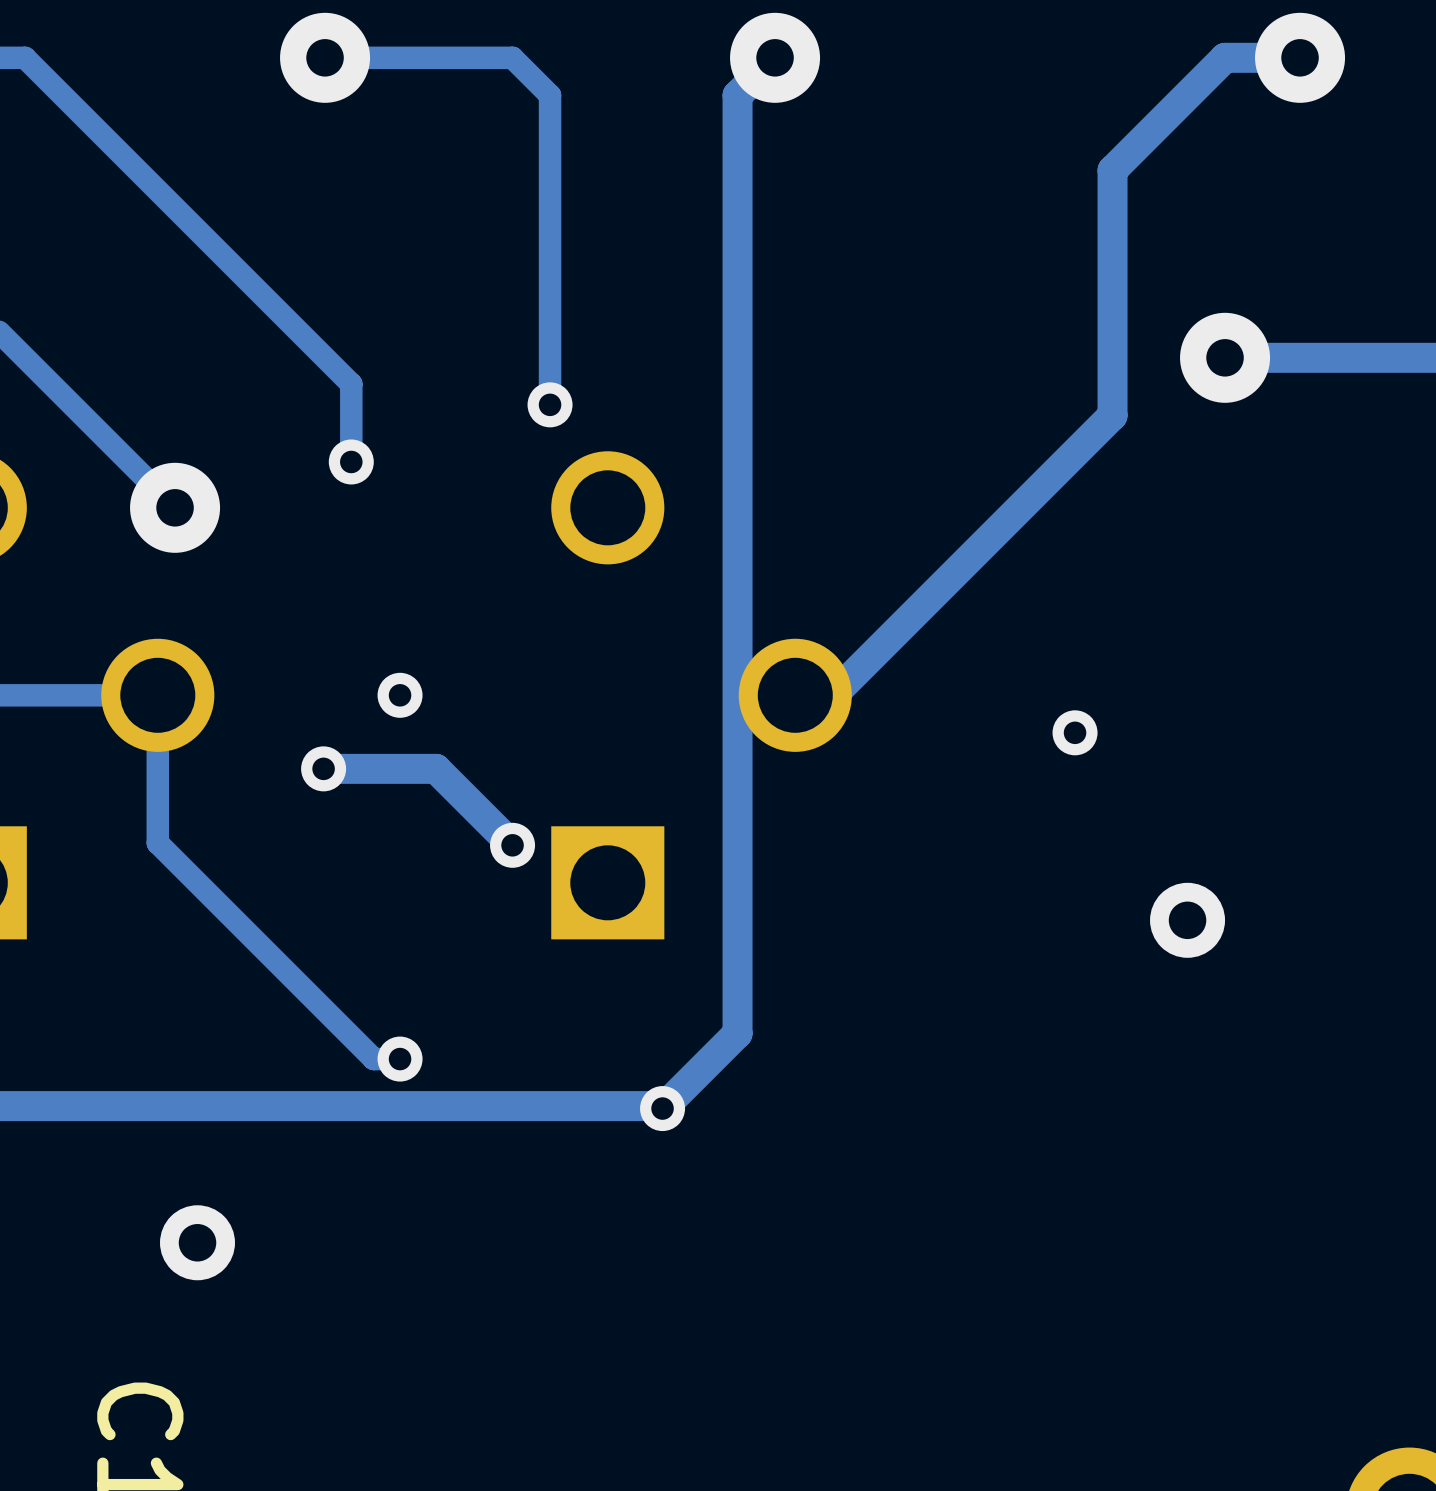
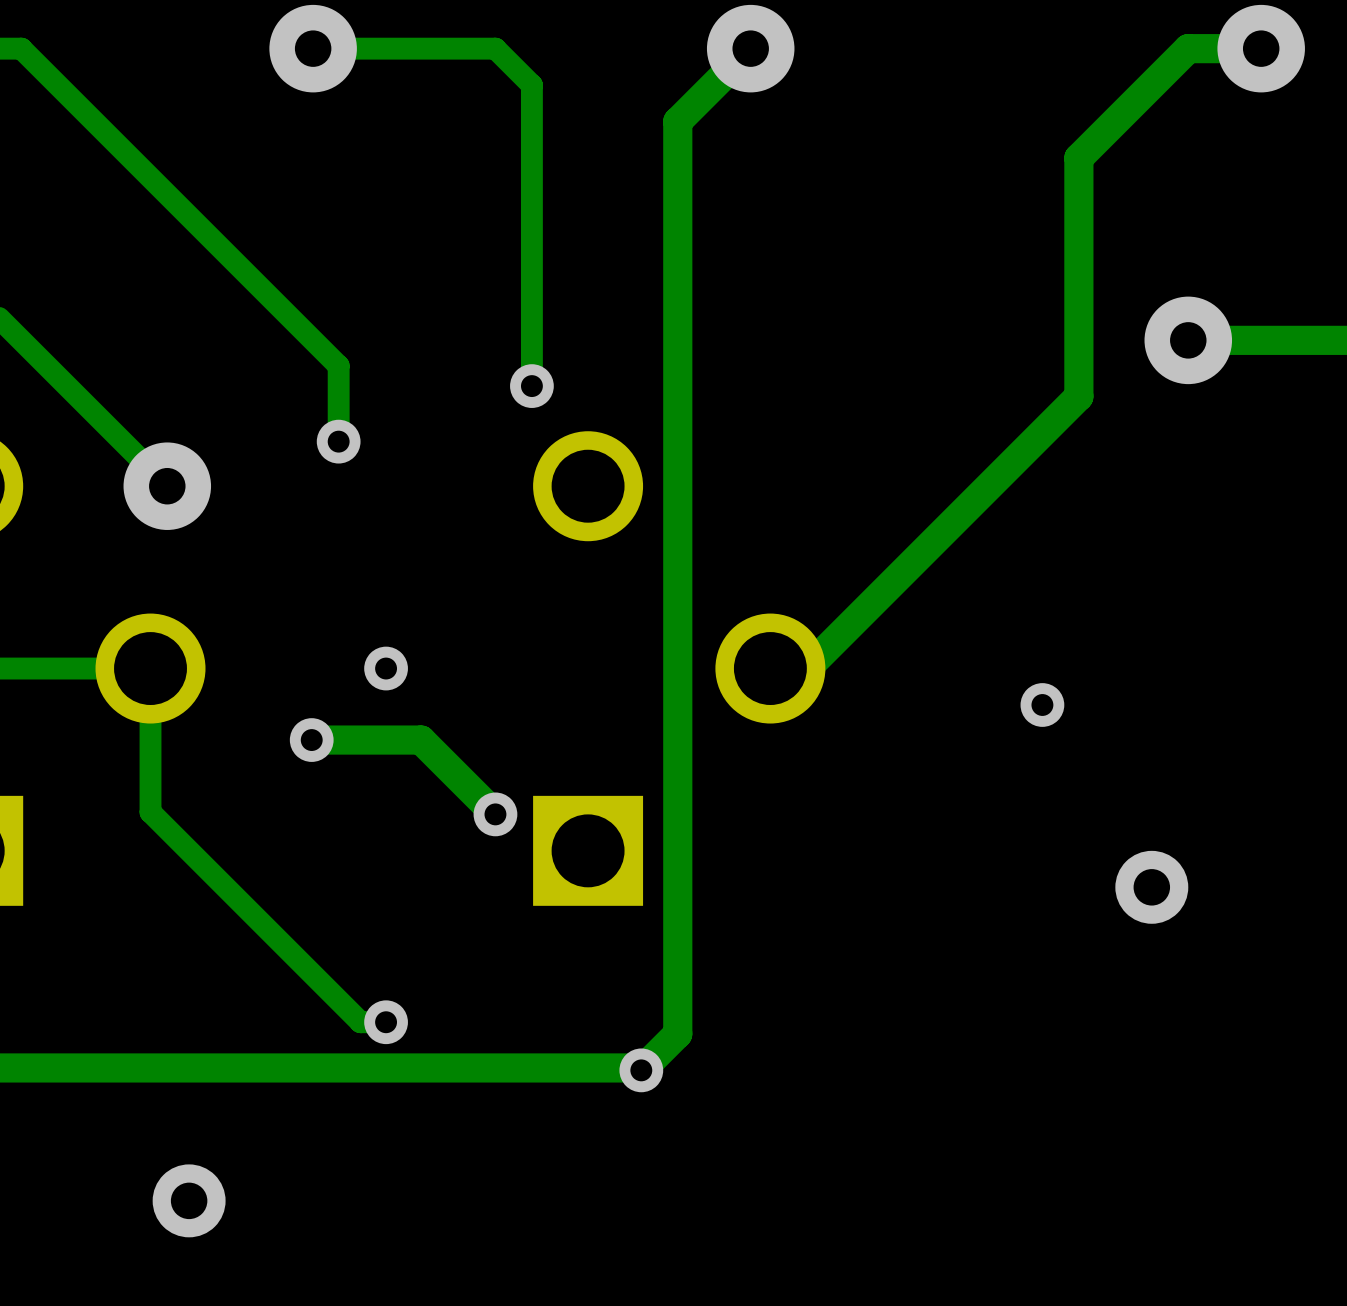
track: (737, 95) (737, 1033) (700, 1071) -> (714, 85) (677, 121) (677, 1033)

